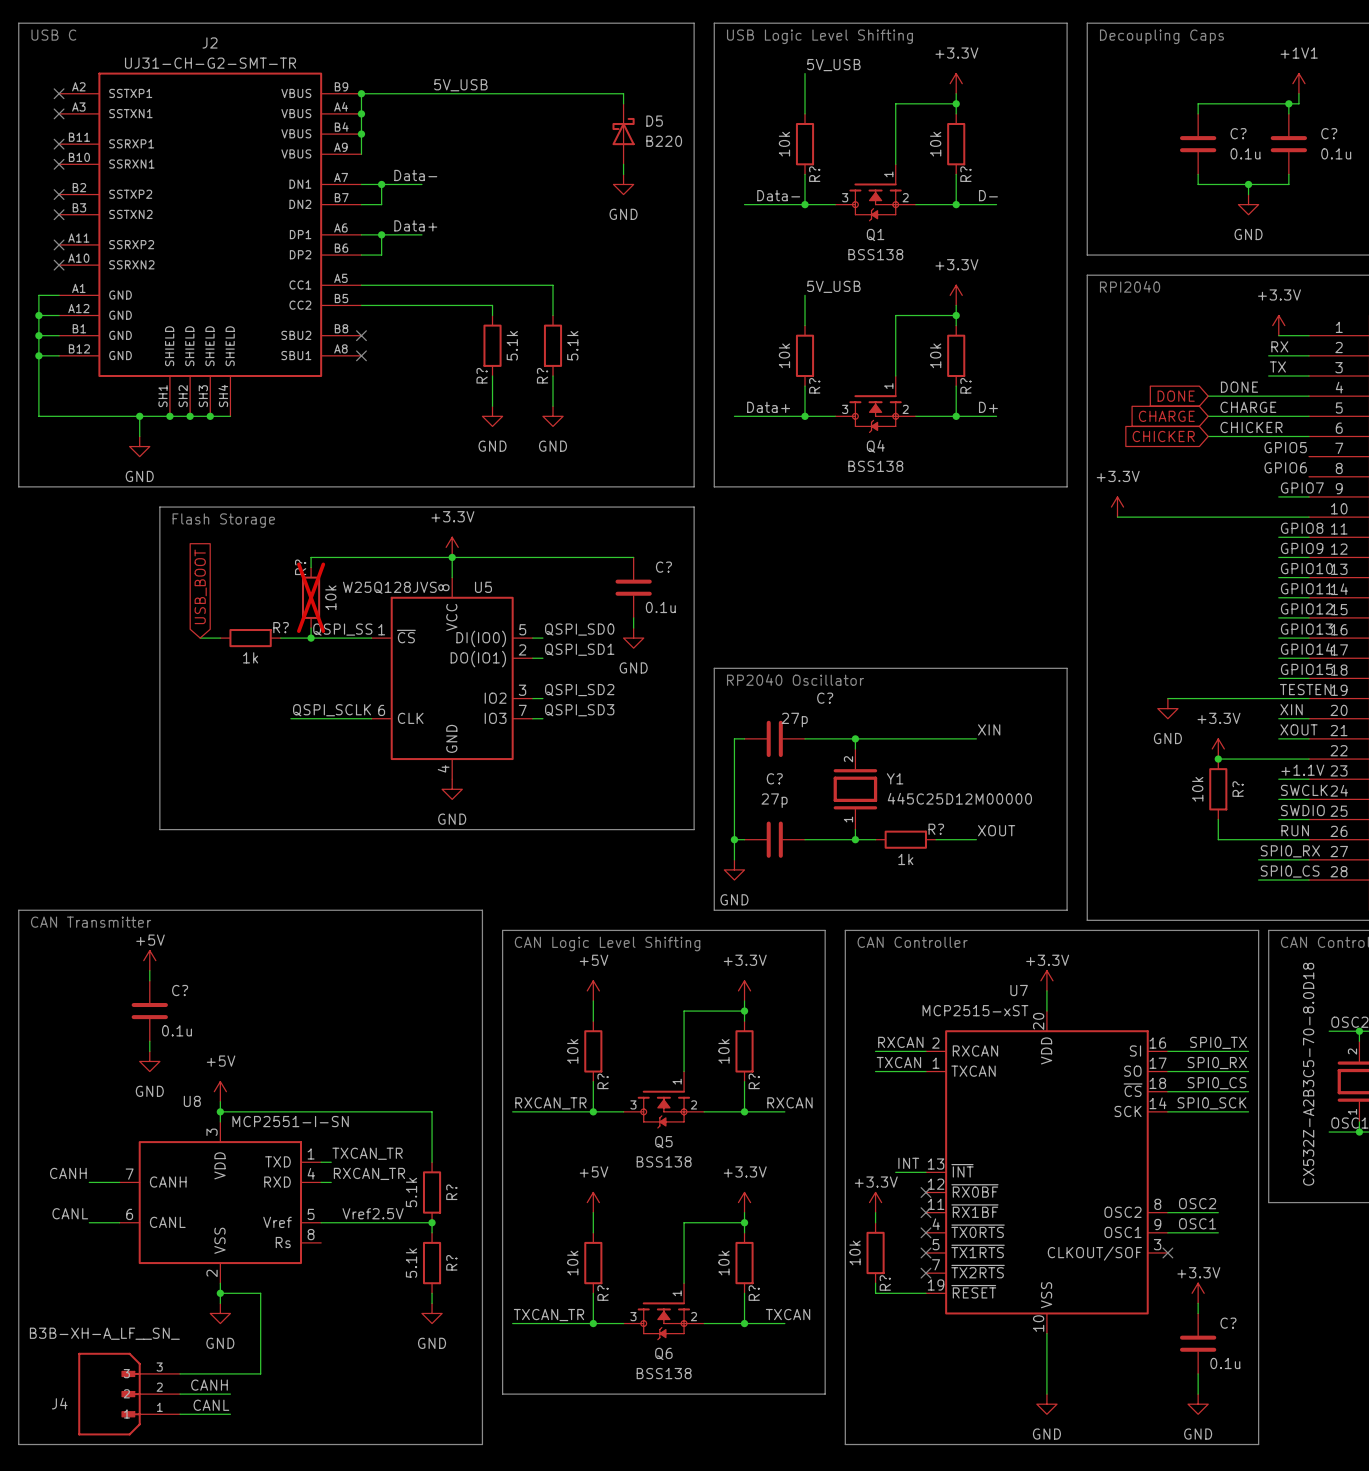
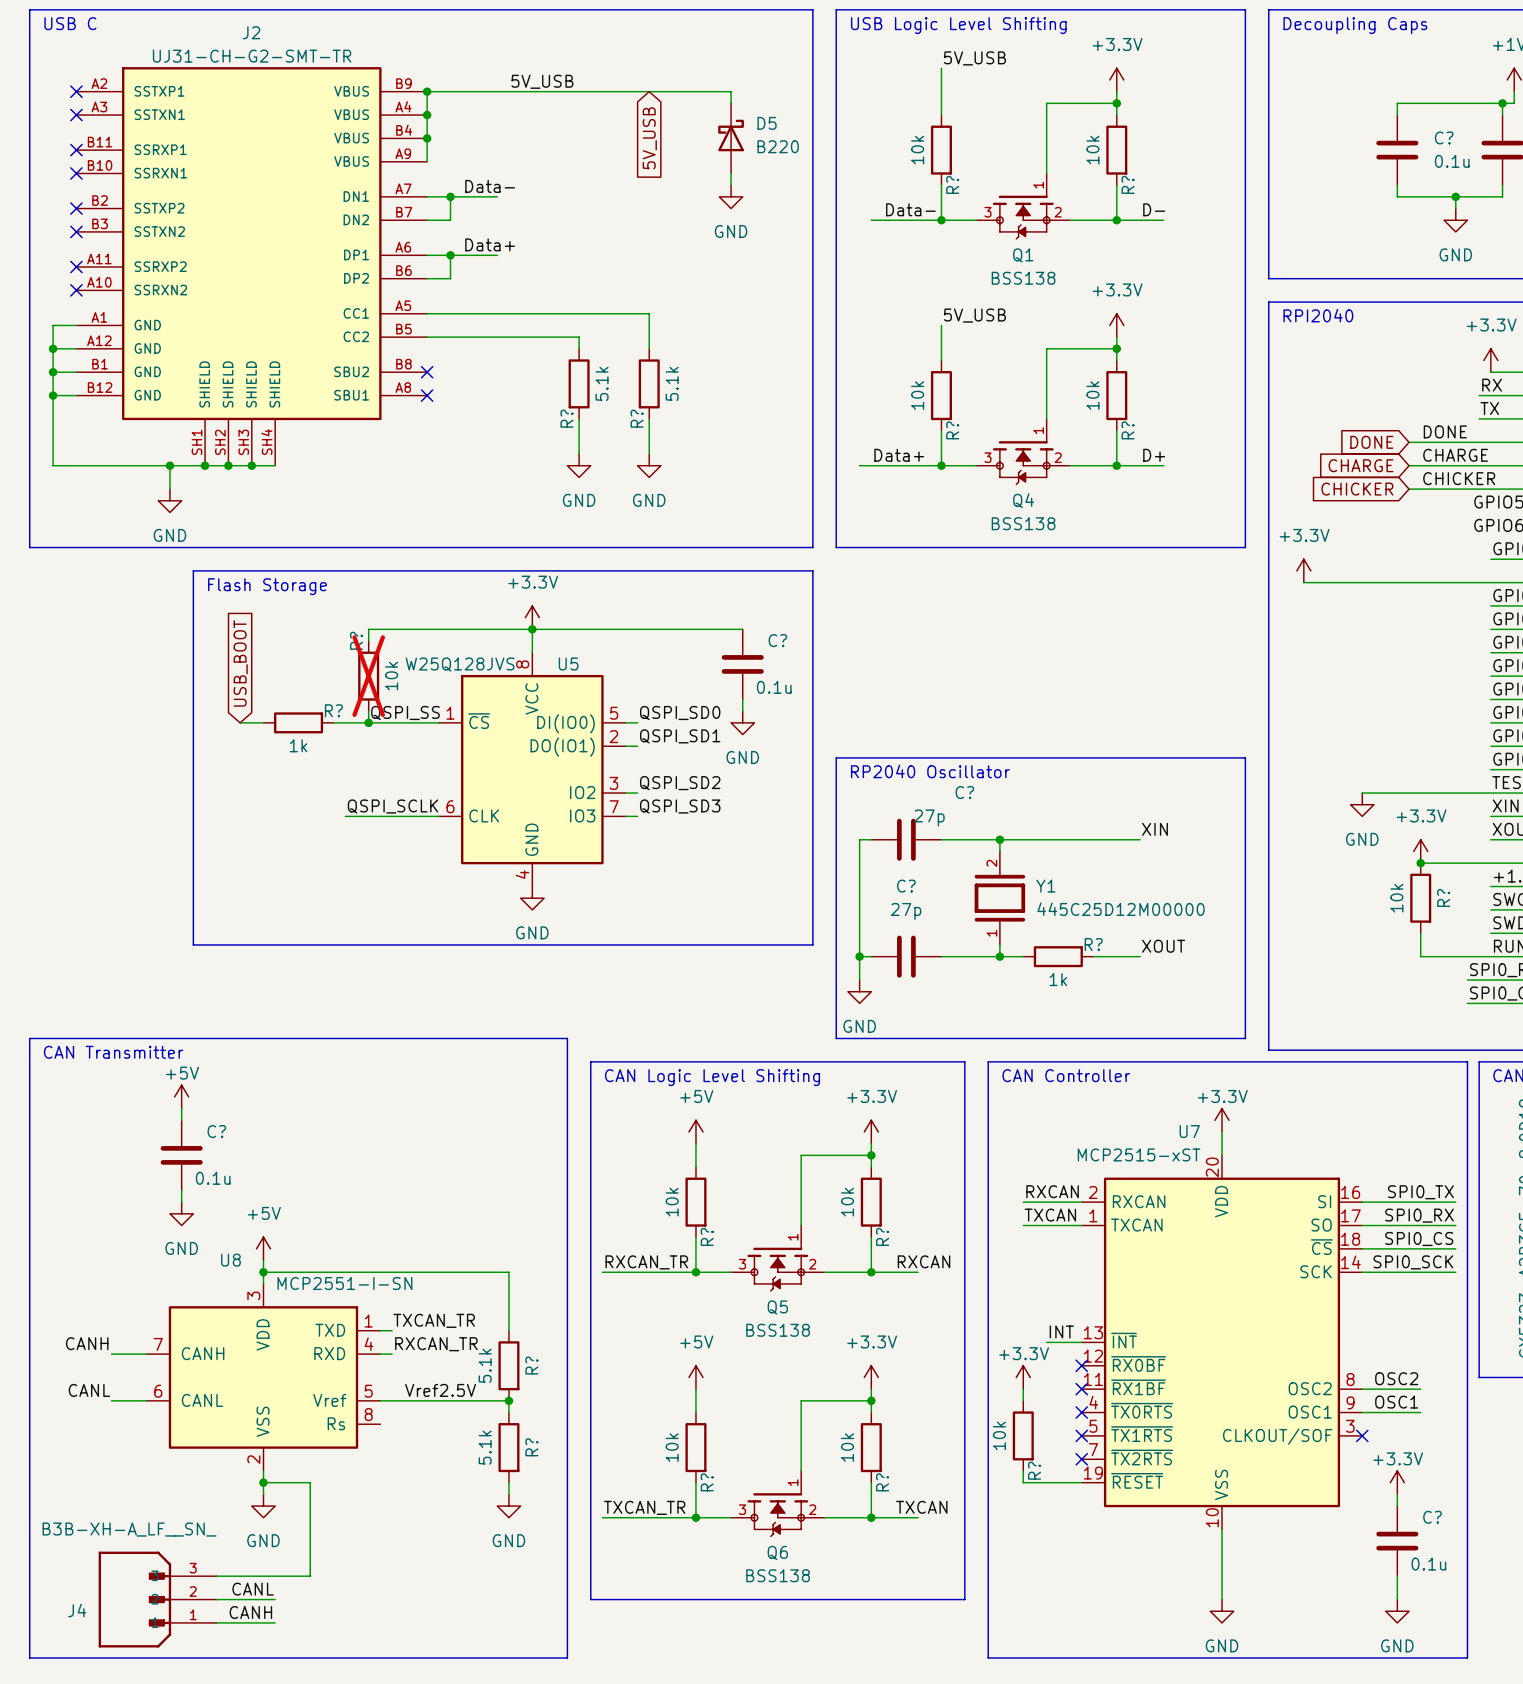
global label: none -> 5V_USB (649, 138)
label: CANH (209, 1385) -> CANL (253, 1589)
label: CANL (211, 1405) -> CANH (250, 1612)

